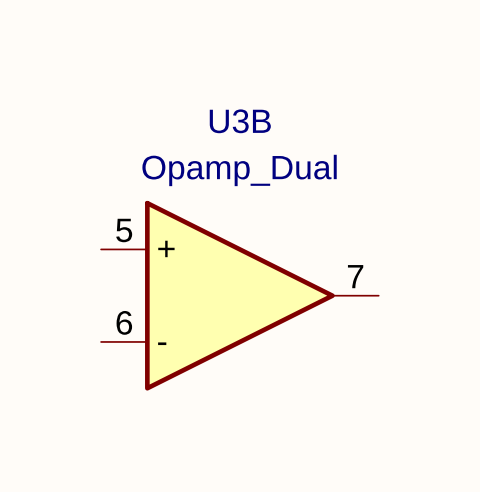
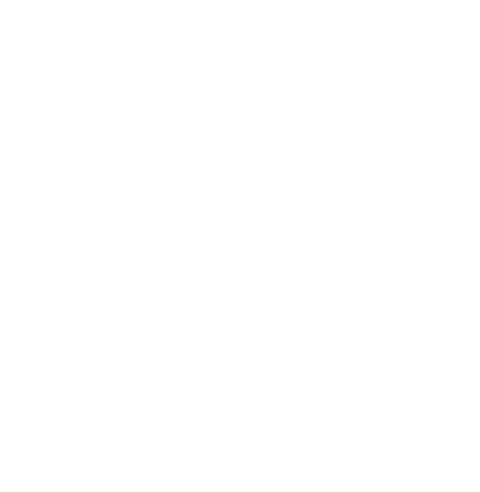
U3B: Opamp_Dual (239, 295) -> none

